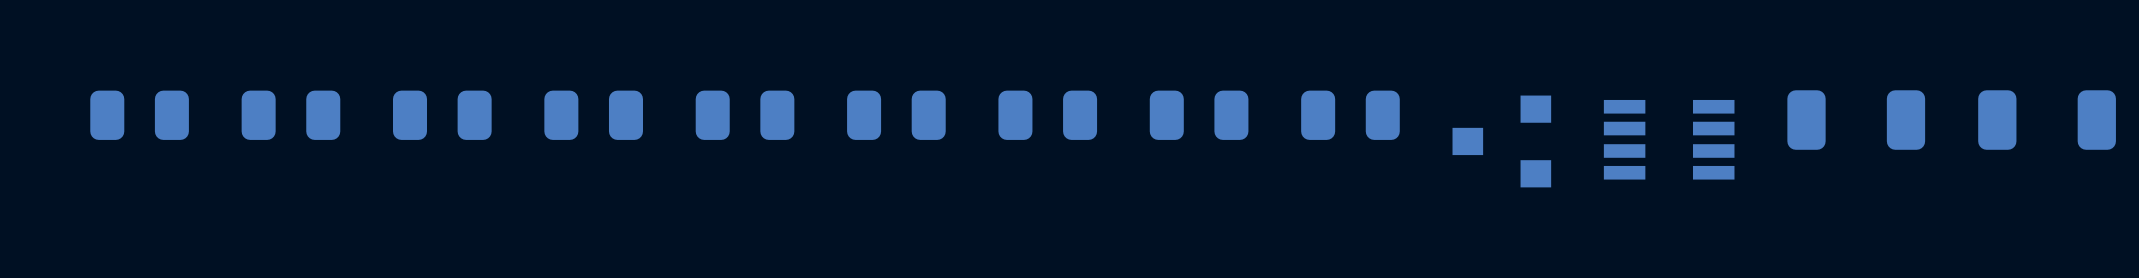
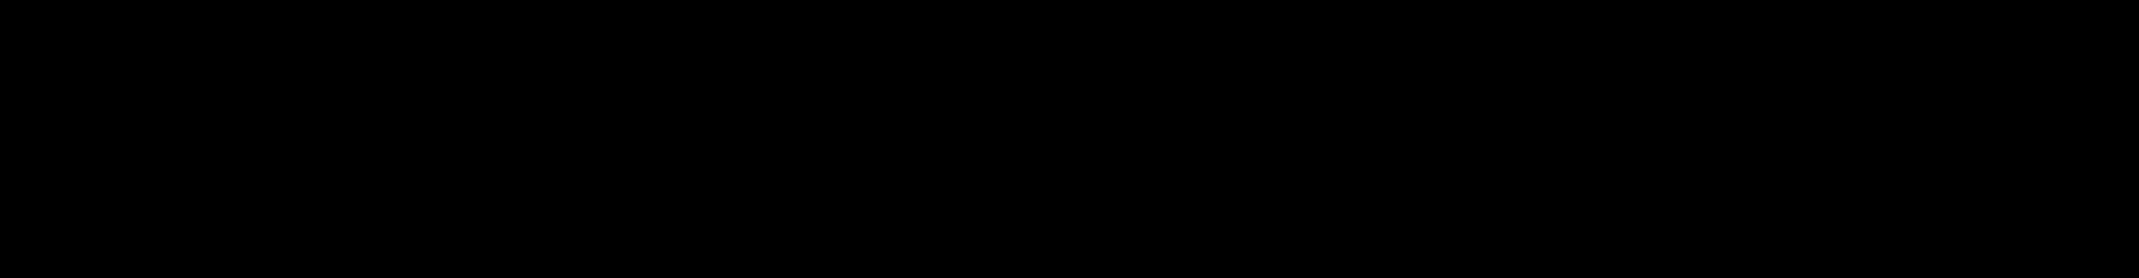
part: (139, 115) -> none
part: (290, 115) -> none
part: (442, 115) -> none
part: (593, 115) -> none
part: (745, 115) -> none
part: (896, 115) -> none
part: (1047, 115) -> none
part: (1199, 115) -> none
part: (1350, 115) -> none
part: (1856, 120) -> none
part: (2047, 120) -> none
part: (1669, 139) -> none
part: (1501, 141) -> none

